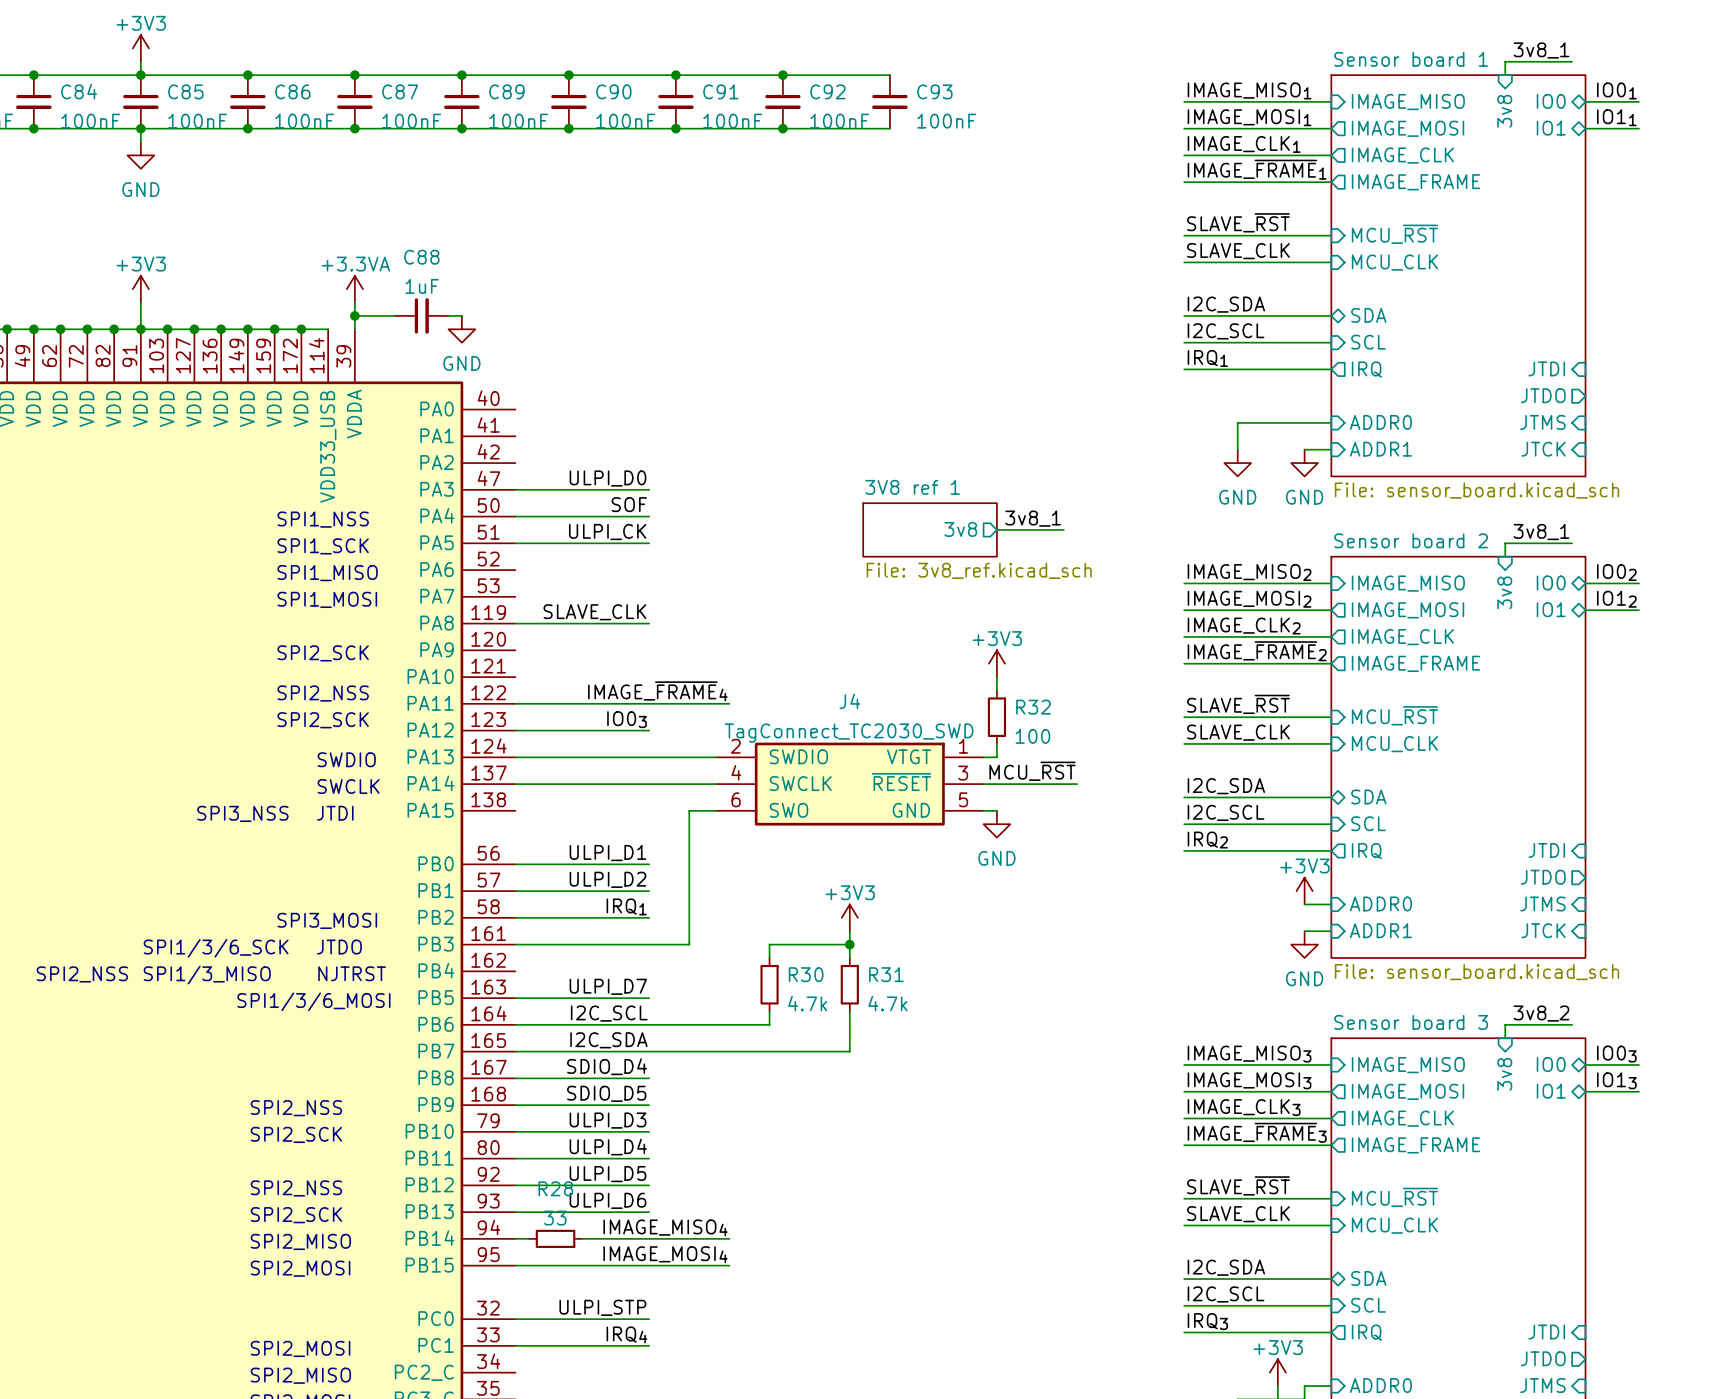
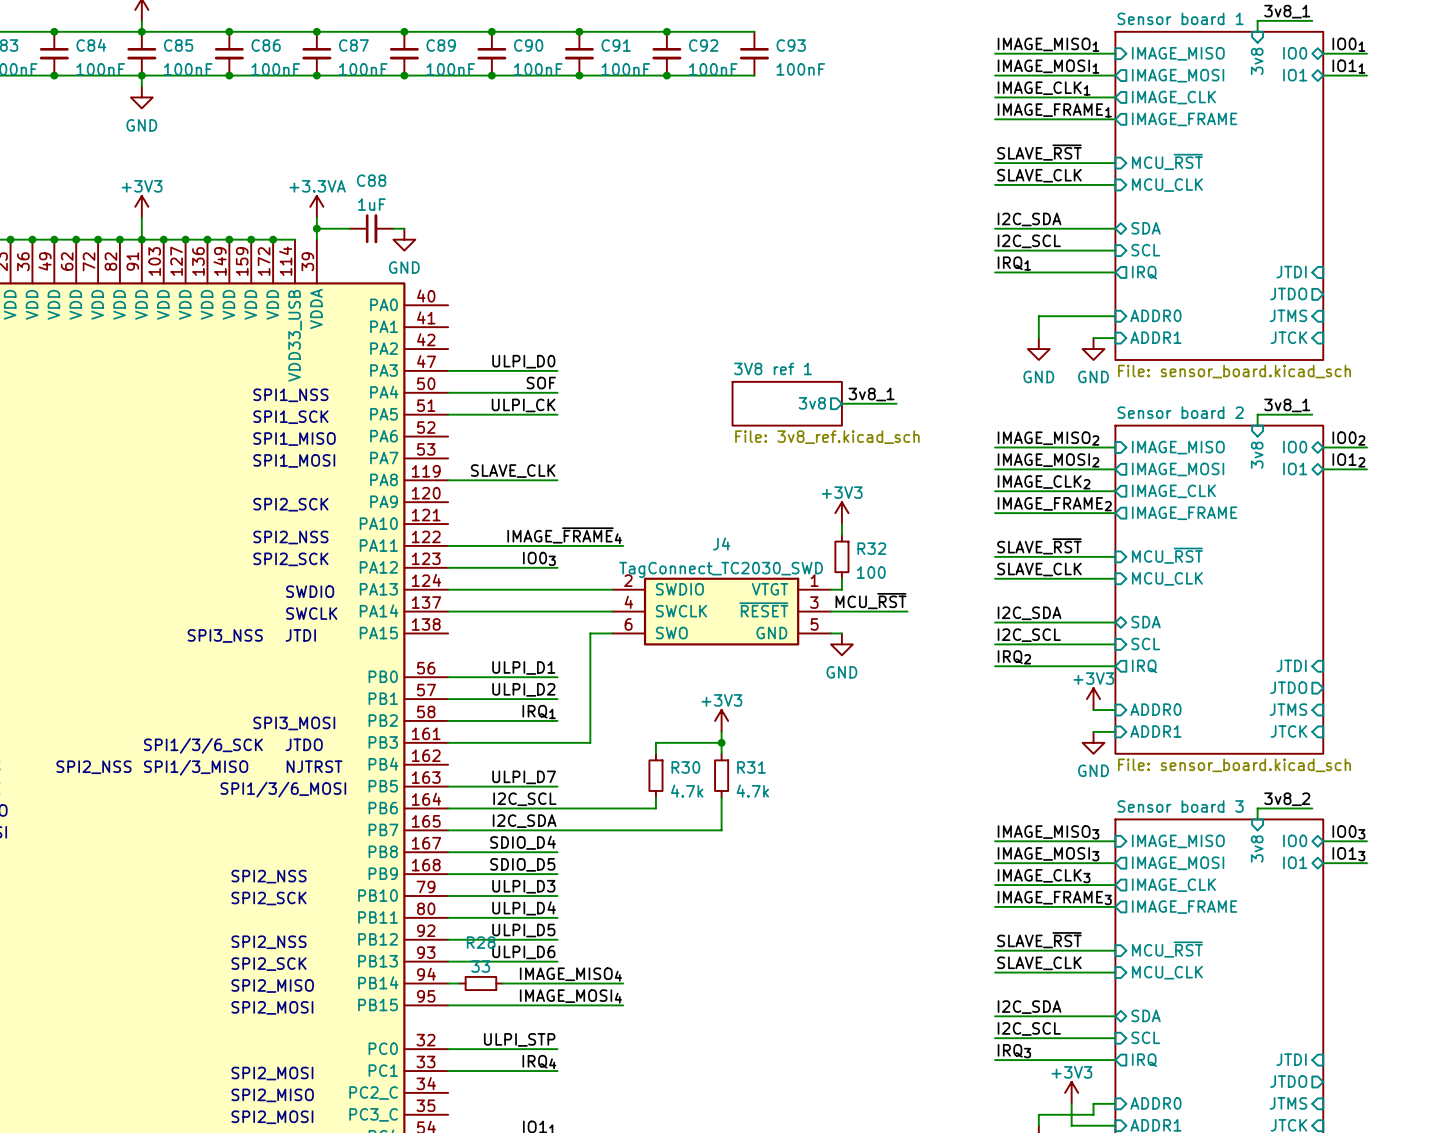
label: IMAGE_~{FRAME}1 (1257, 169) -> IMAGE_FRAME1 (1054, 110)
label: IMAGE_~{FRAME}2 (1257, 651) -> IMAGE_FRAME2 (1054, 504)
label: IMAGE_~{FRAME}3 (1257, 1132) -> IMAGE_FRAME3 (1054, 897)

